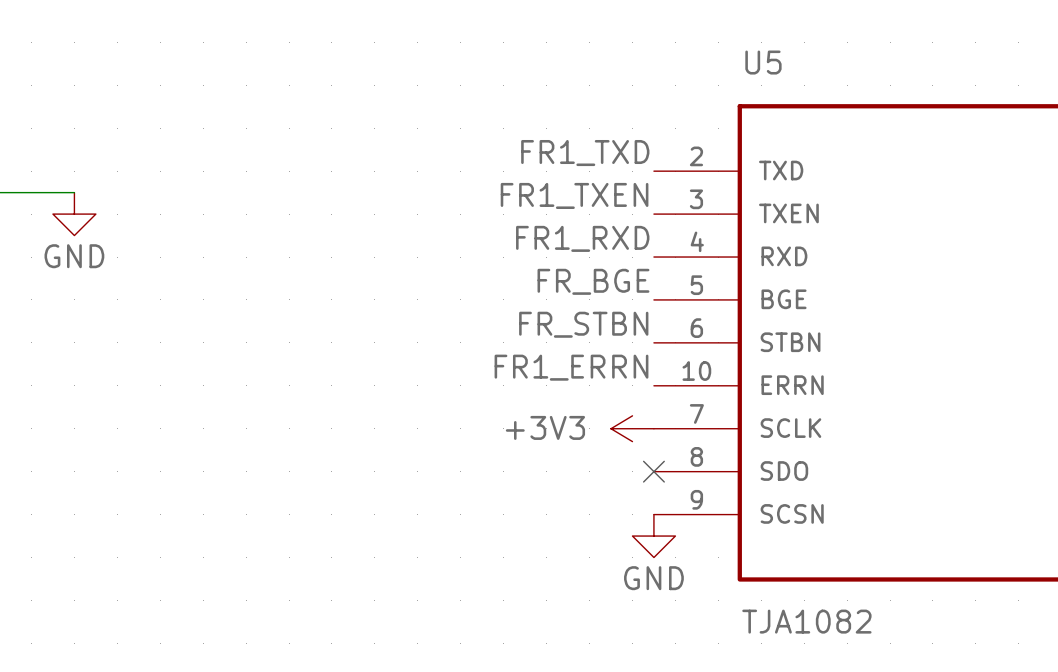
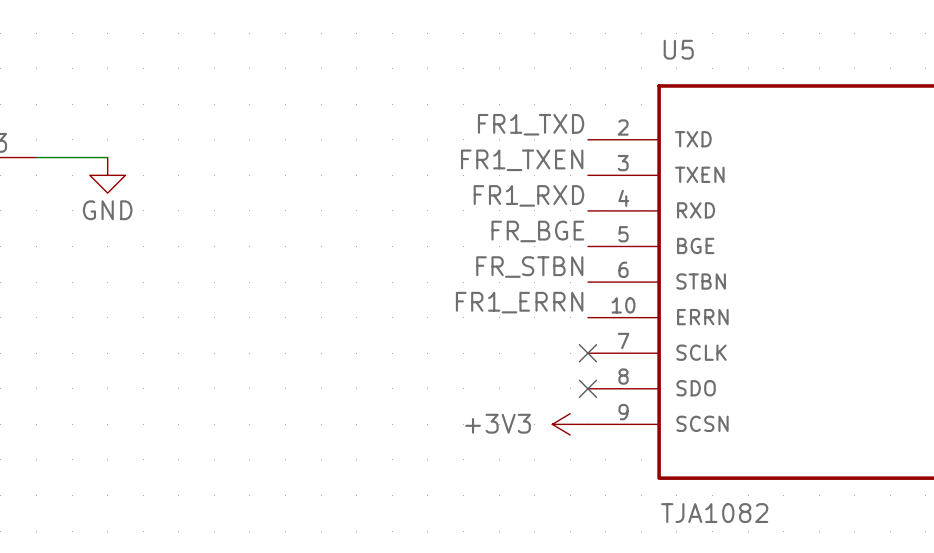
power symbol position: +3V3 (632, 428) -> +3V3 (570, 424)
no-connect mark: none -> (587, 353)
power symbol: GND (653, 536) -> none

